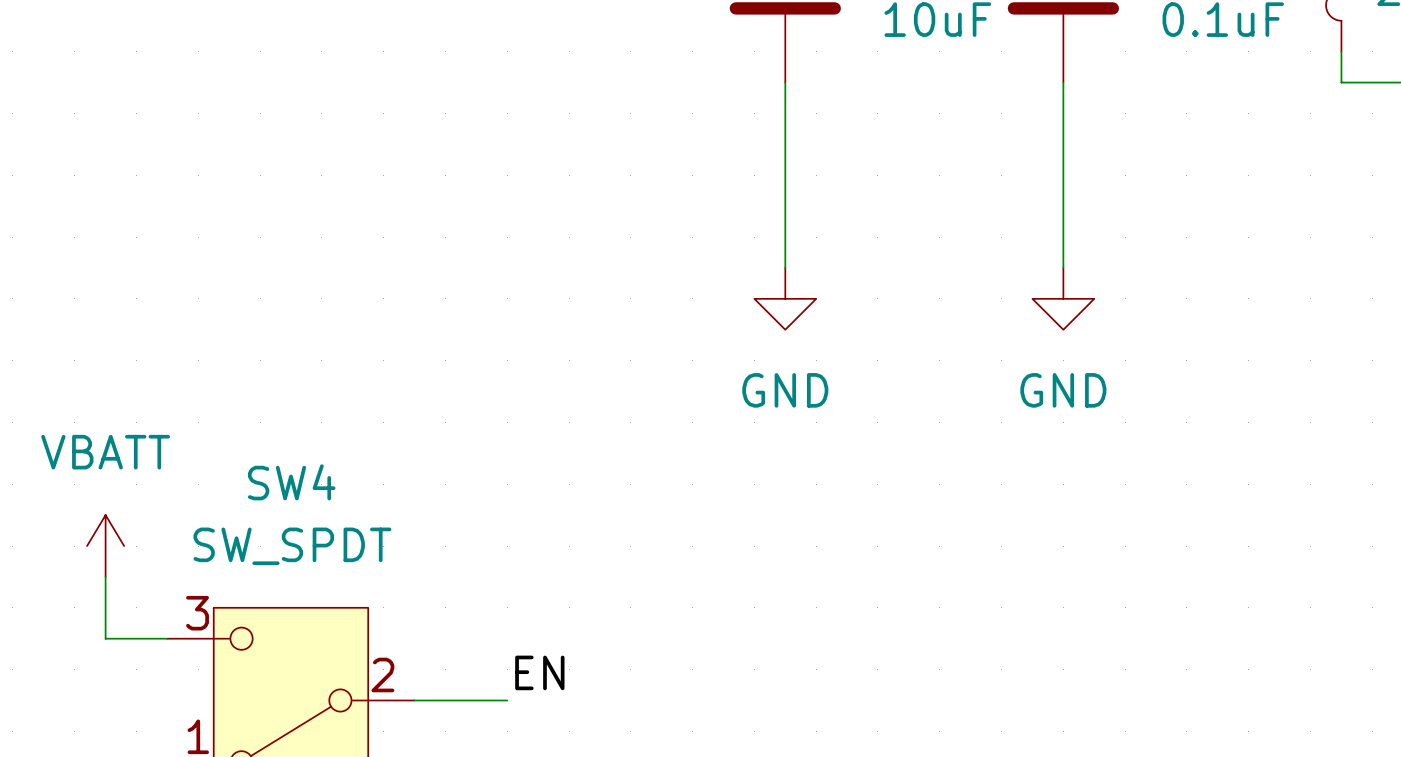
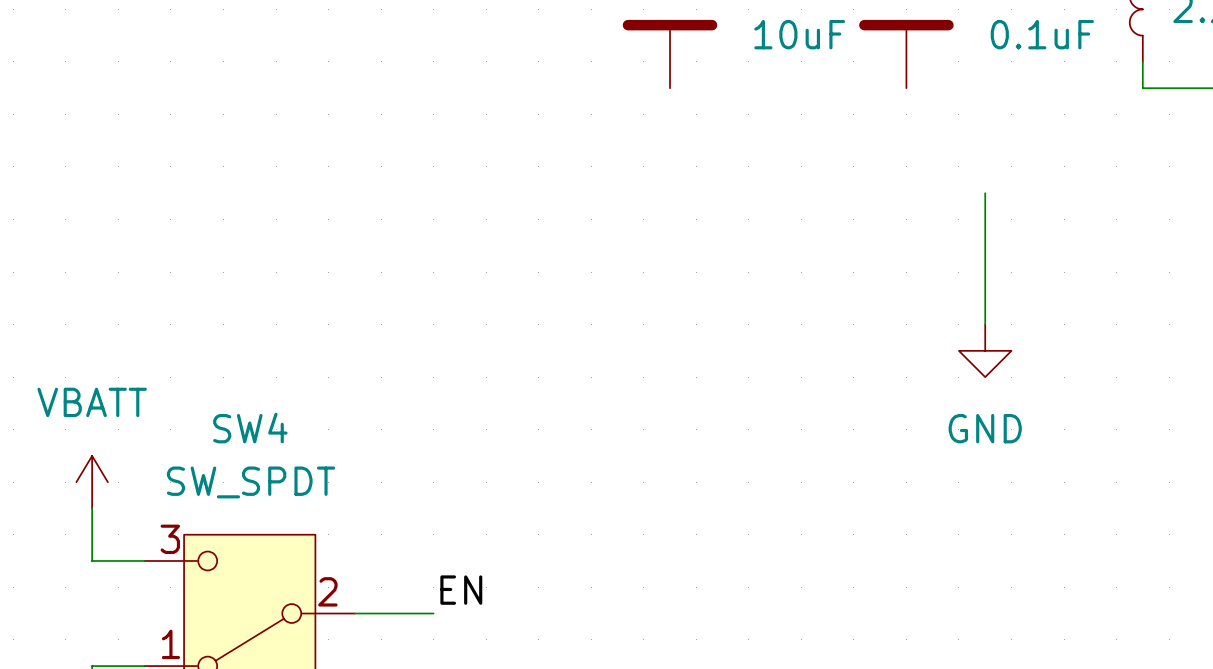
wire: (785, 82) (785, 267) -> none
wire: (1063, 82) (1063, 267) -> none
wire: none -> (985, 193) (985, 324)
power symbol: GND (785, 298) -> none
power symbol position: GND (1063, 298) -> GND (985, 350)

